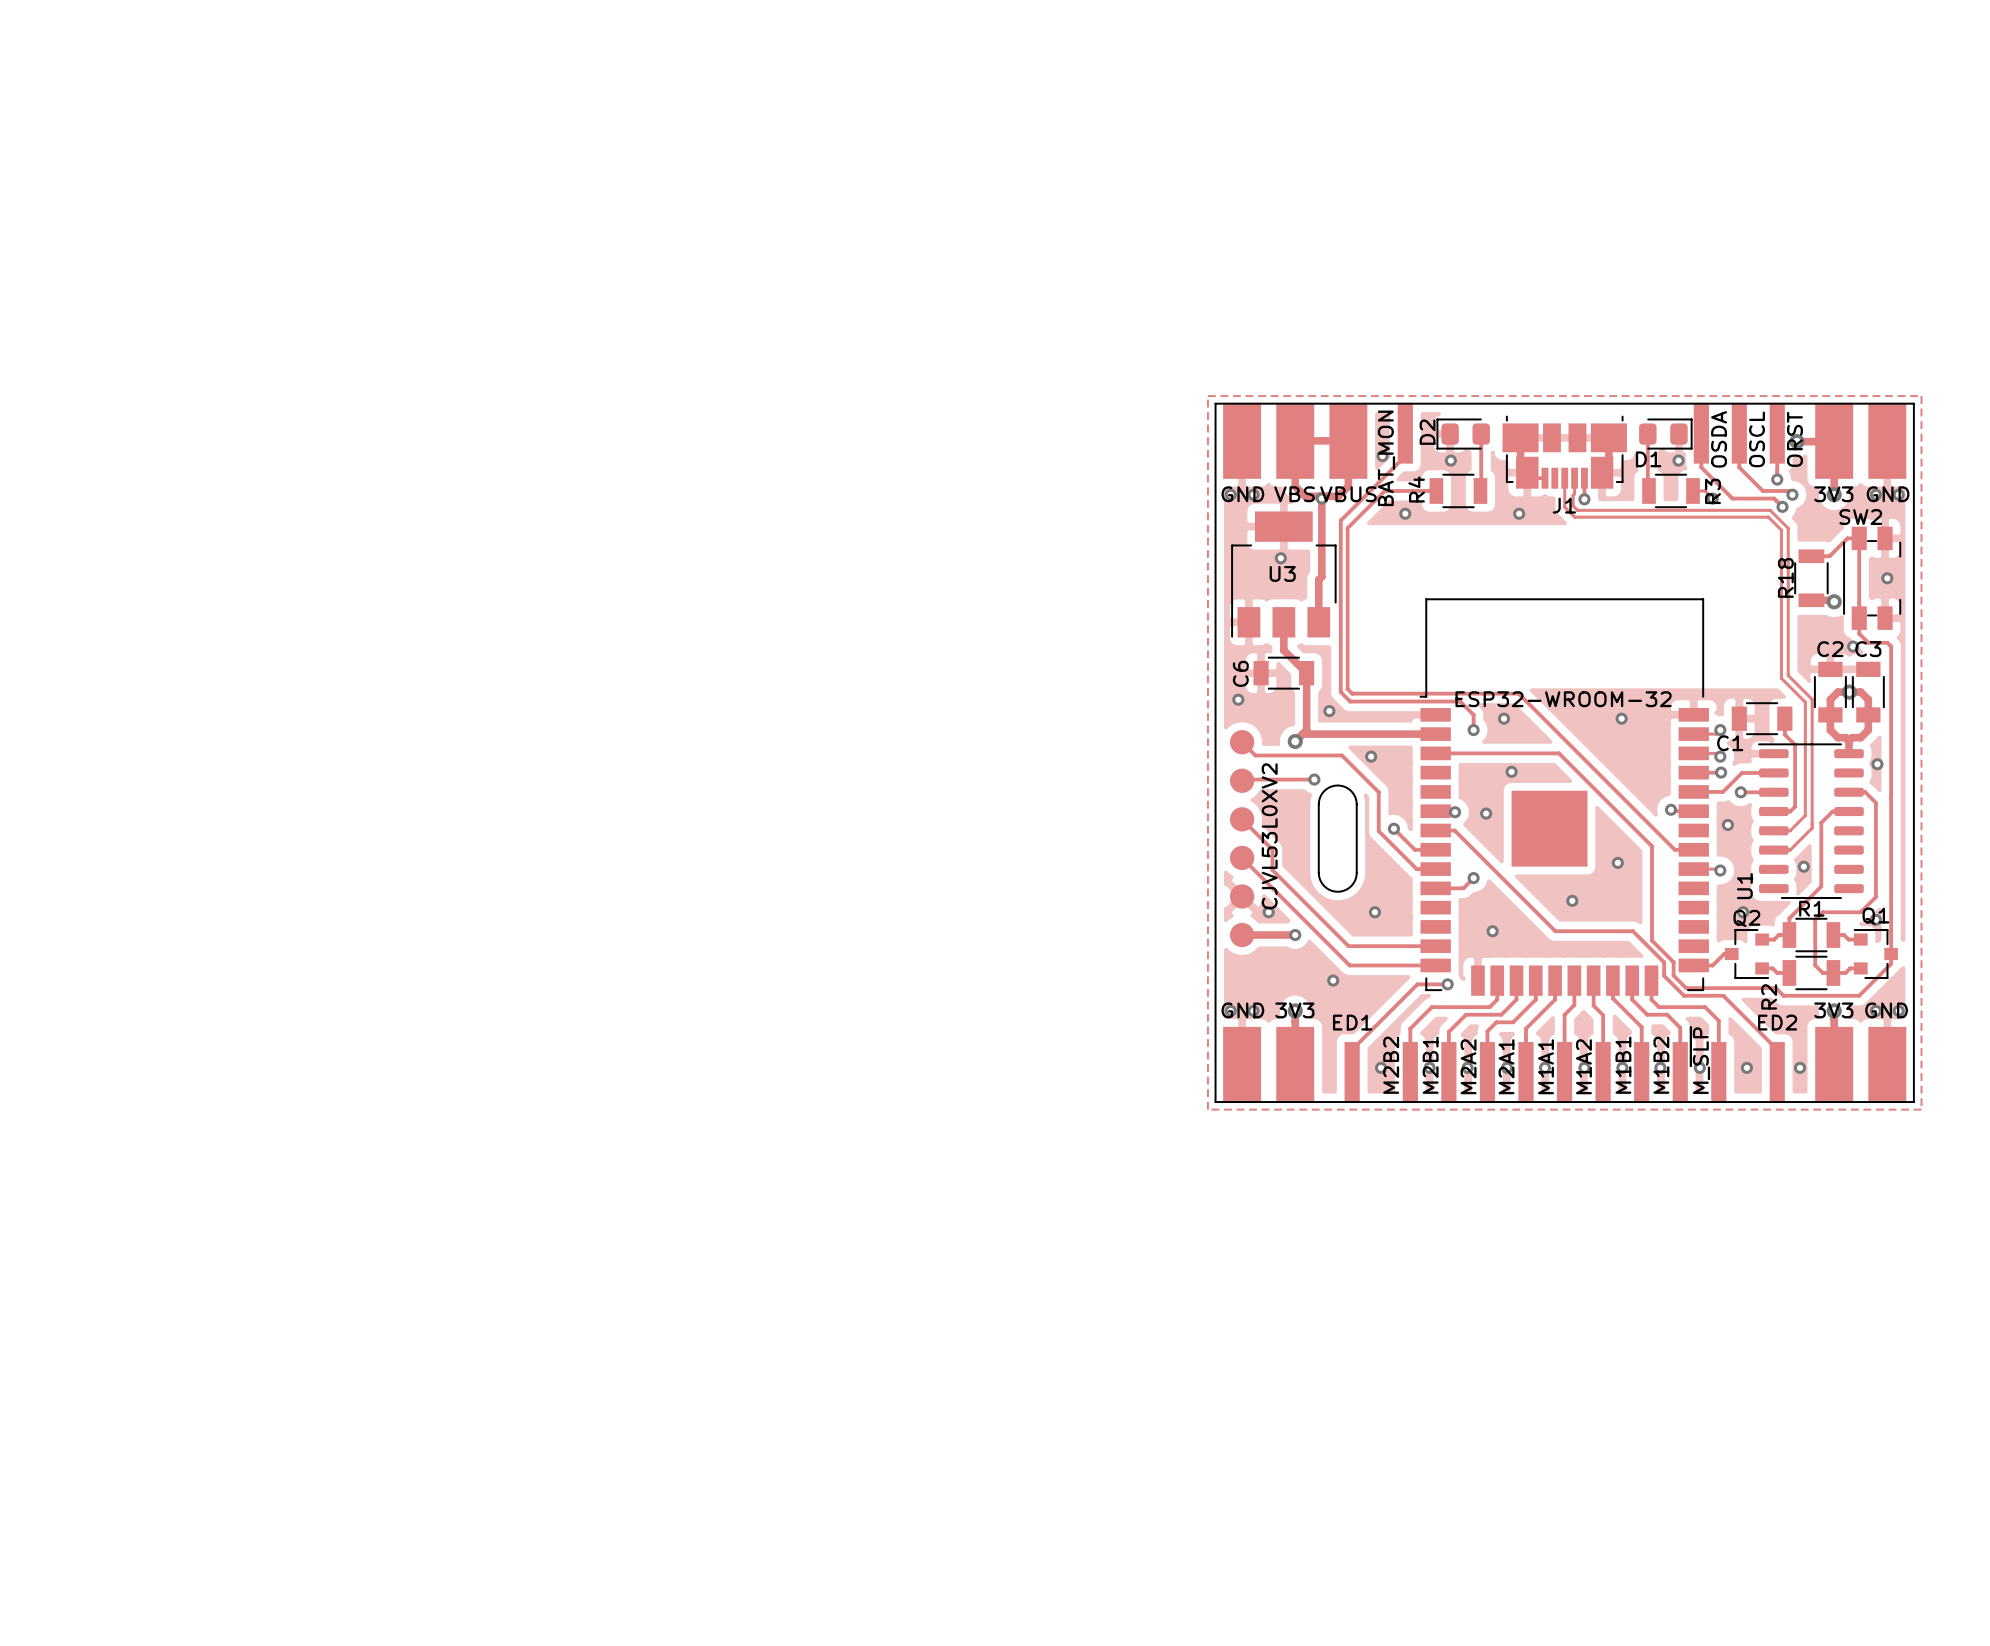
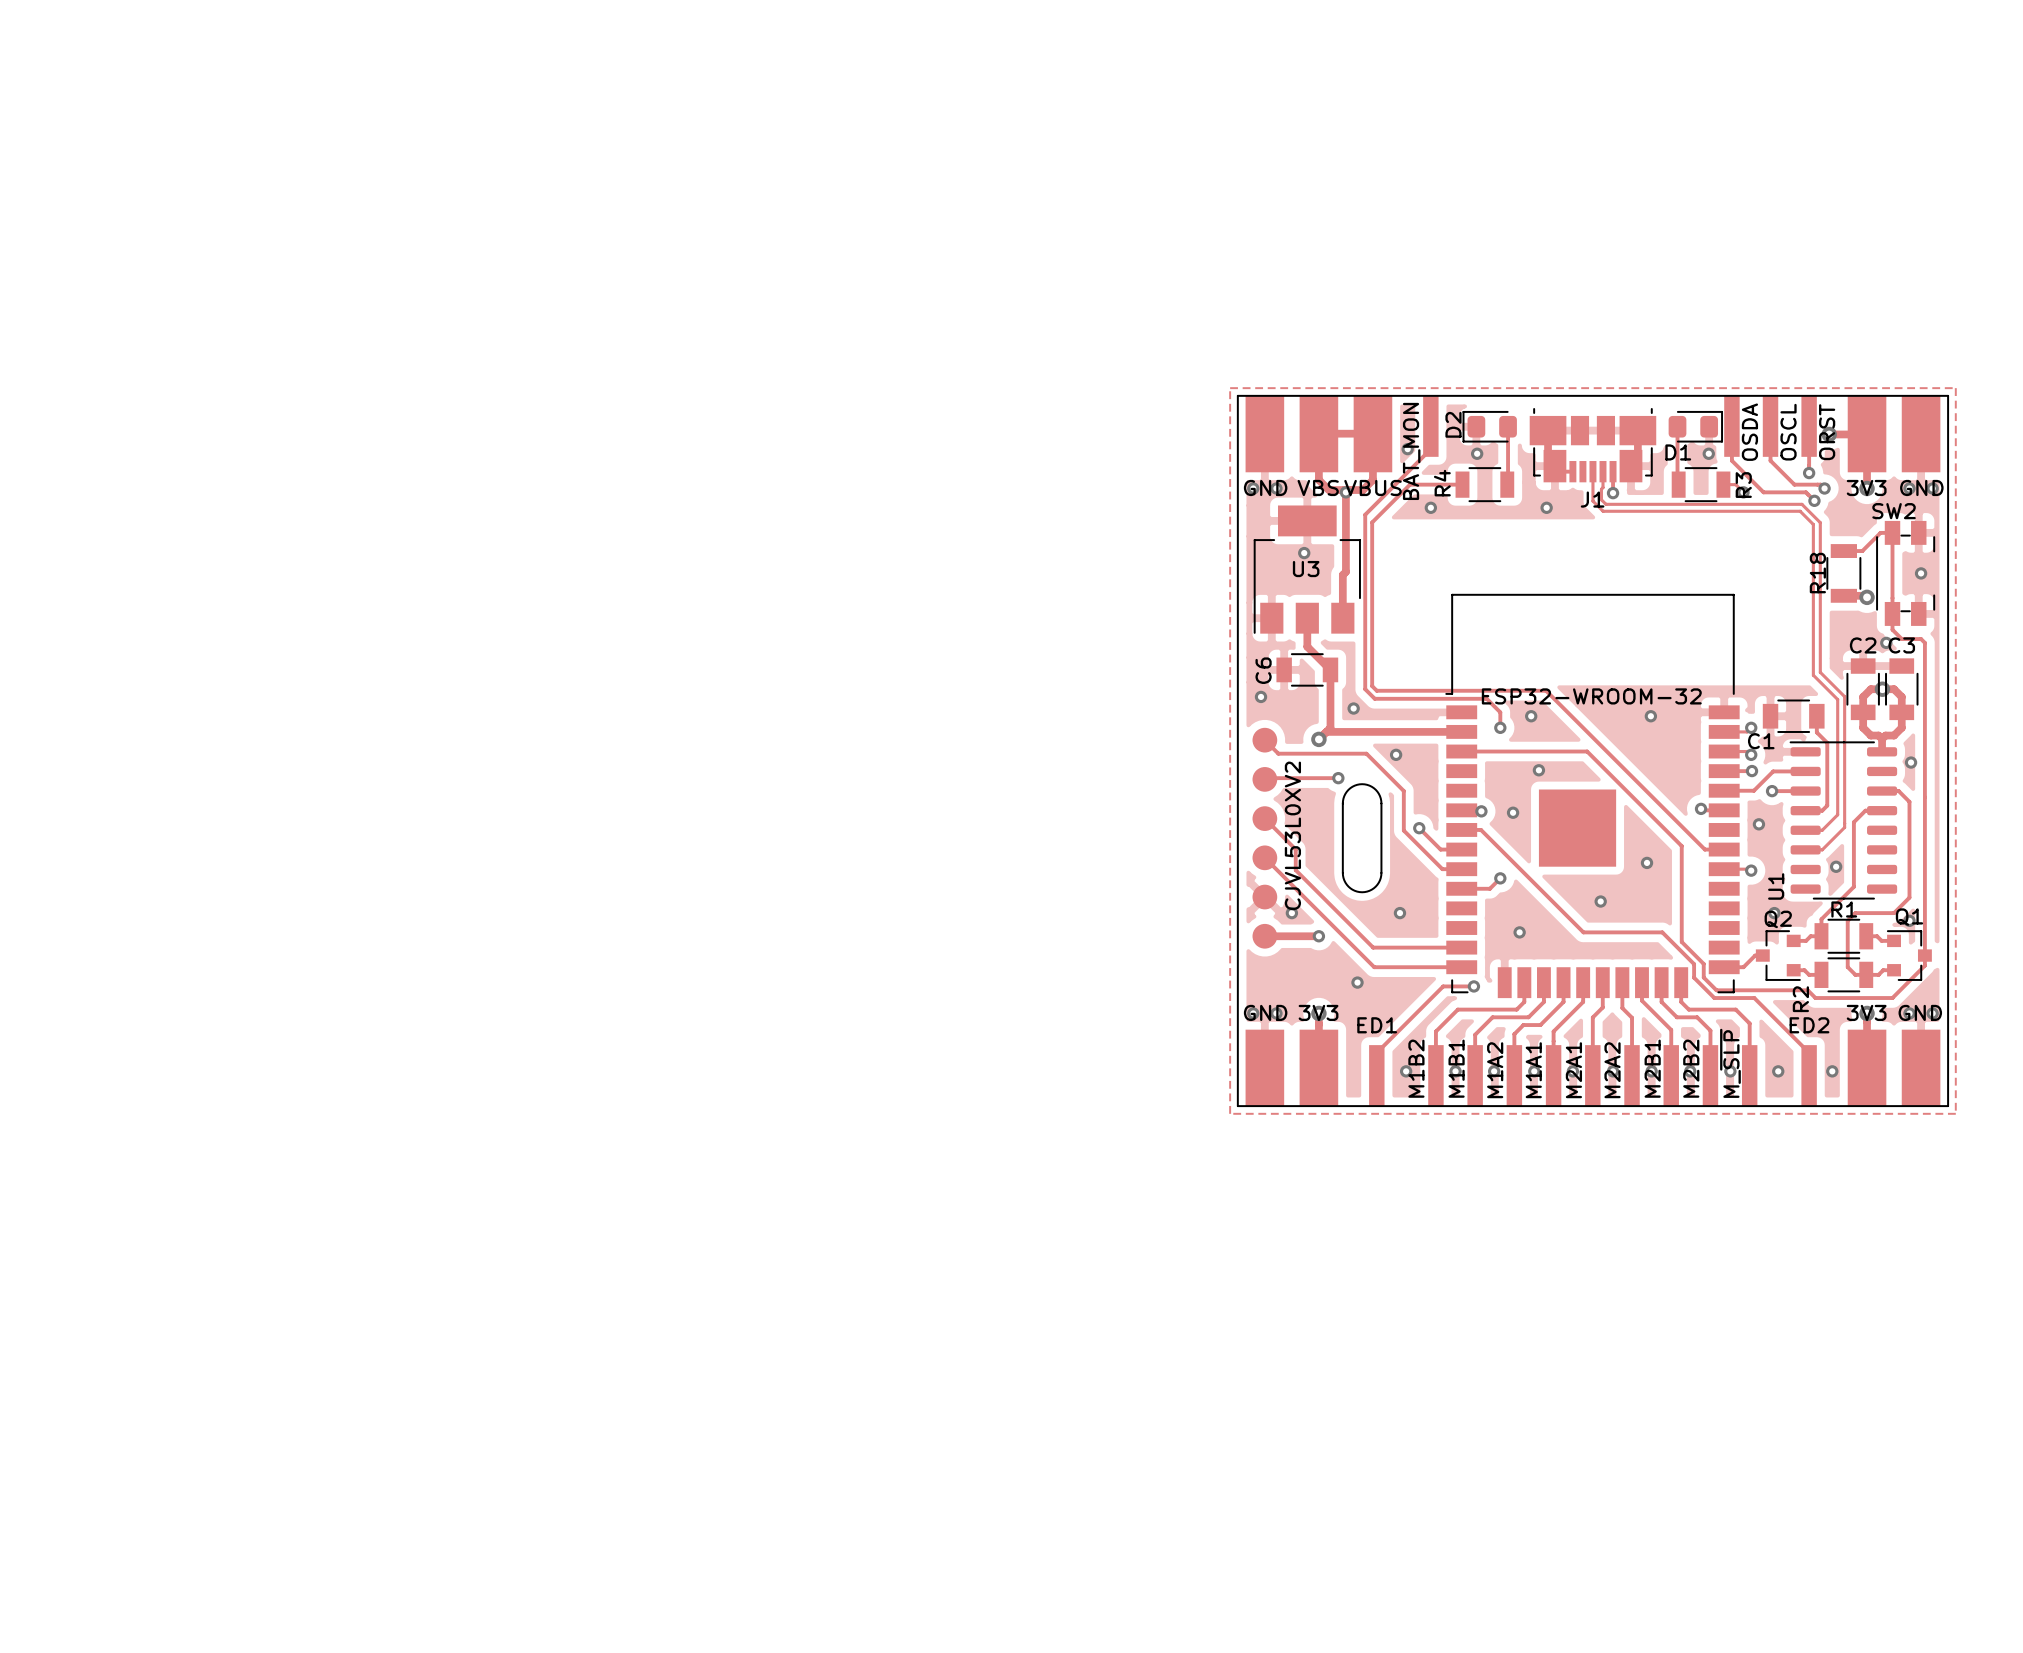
part value: M2B2 (1391, 1065) -> M1B2 (1416, 1068)
part value: M2B1 (1430, 1065) -> M1B1 (1456, 1068)
part value: M1B1 (1623, 1065) -> M2B1 (1652, 1068)
part value: M1B2 (1661, 1065) -> M2B2 (1691, 1068)
part value: M2A2 (1468, 1066) -> M1A2 (1495, 1070)
part value: M2A1 (1506, 1066) -> M1A1 (1533, 1070)
part value: M1A1 (1545, 1066) -> M2A1 (1573, 1070)
part value: M1A2 (1583, 1066) -> M2A2 (1612, 1070)

